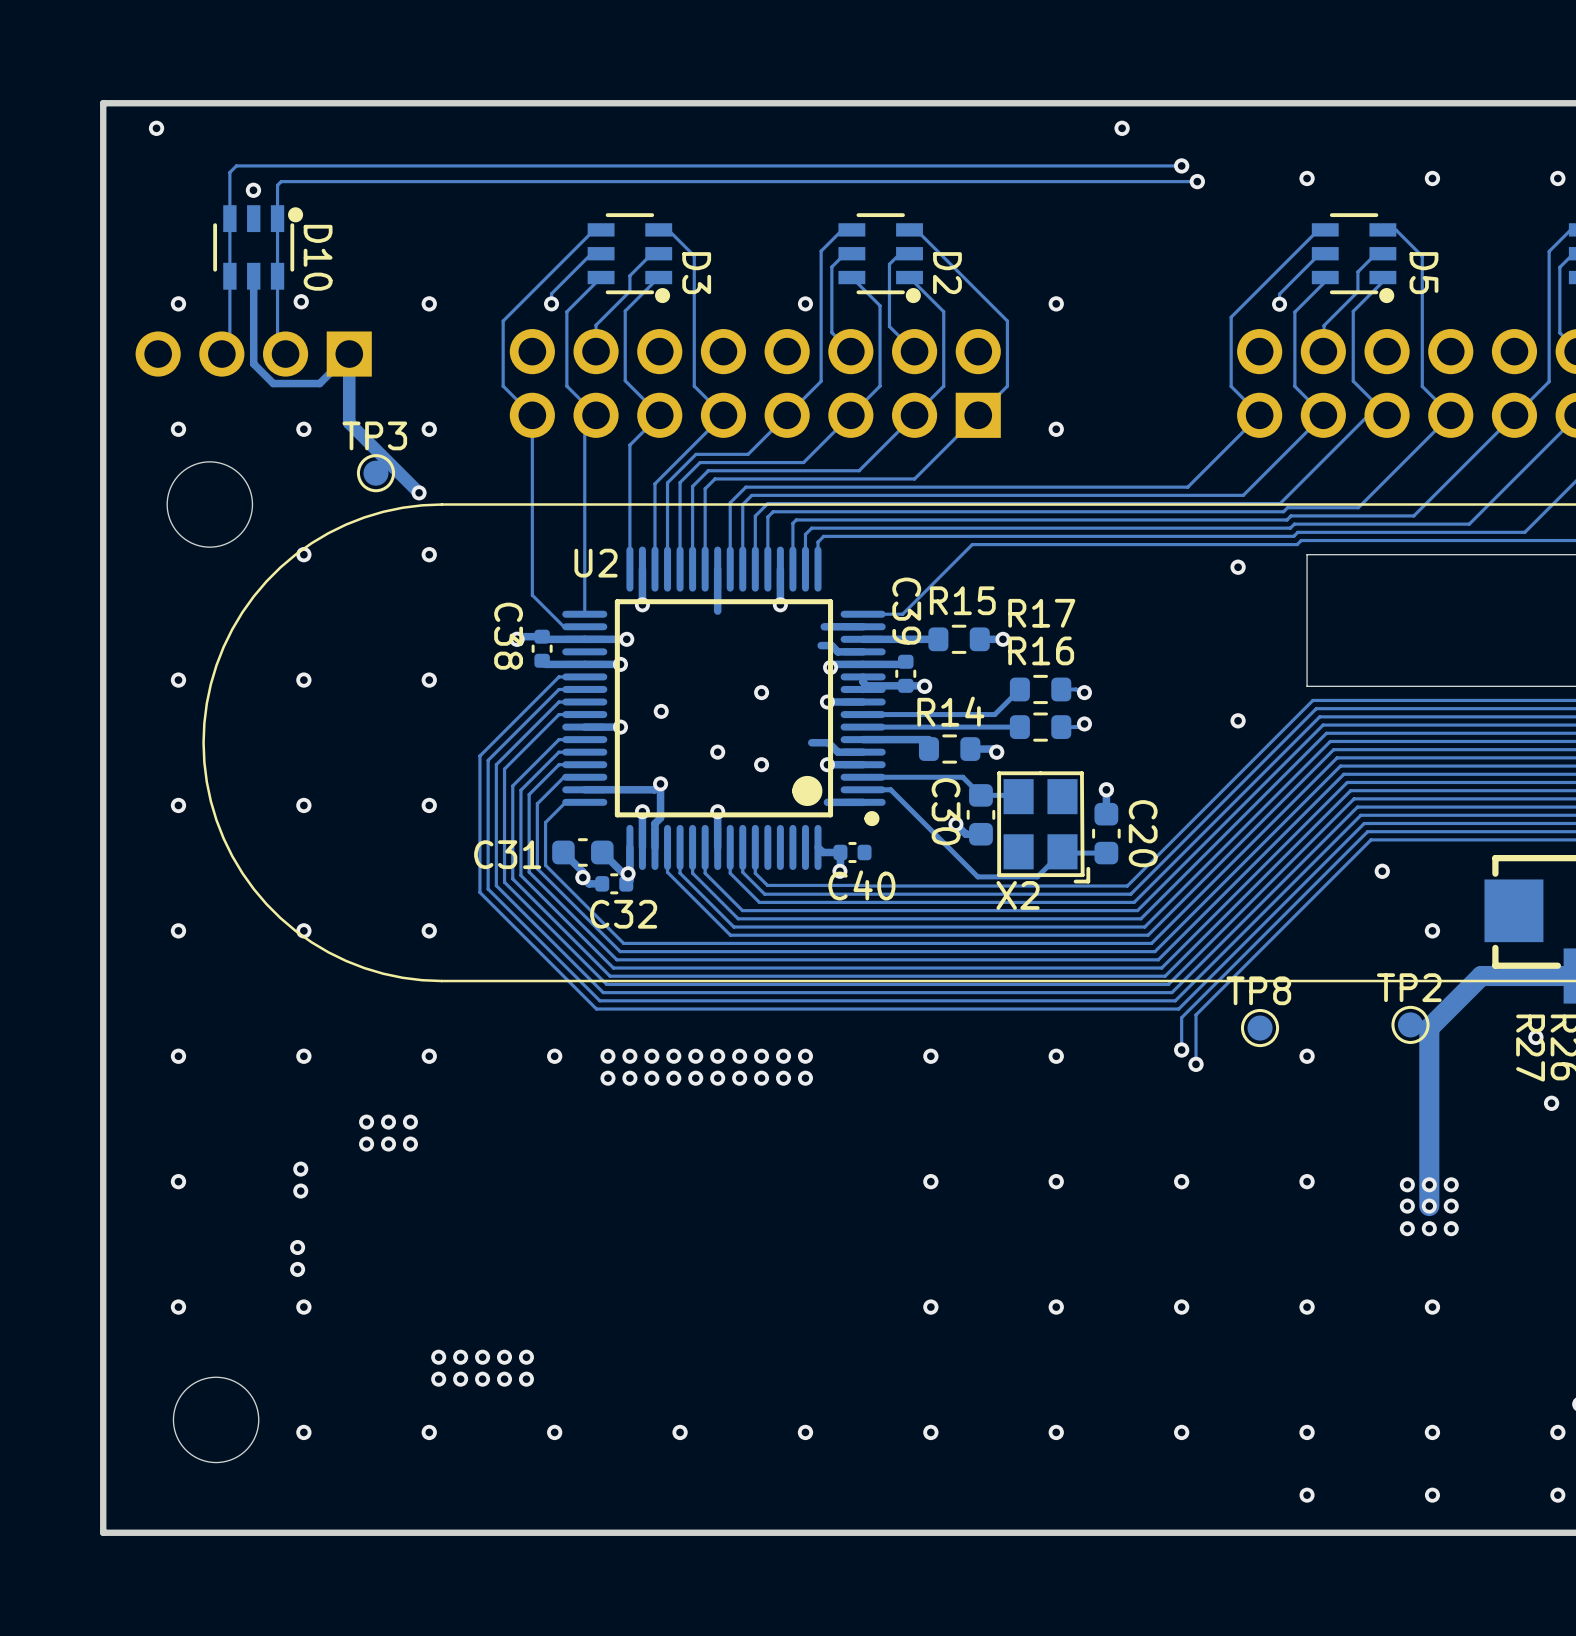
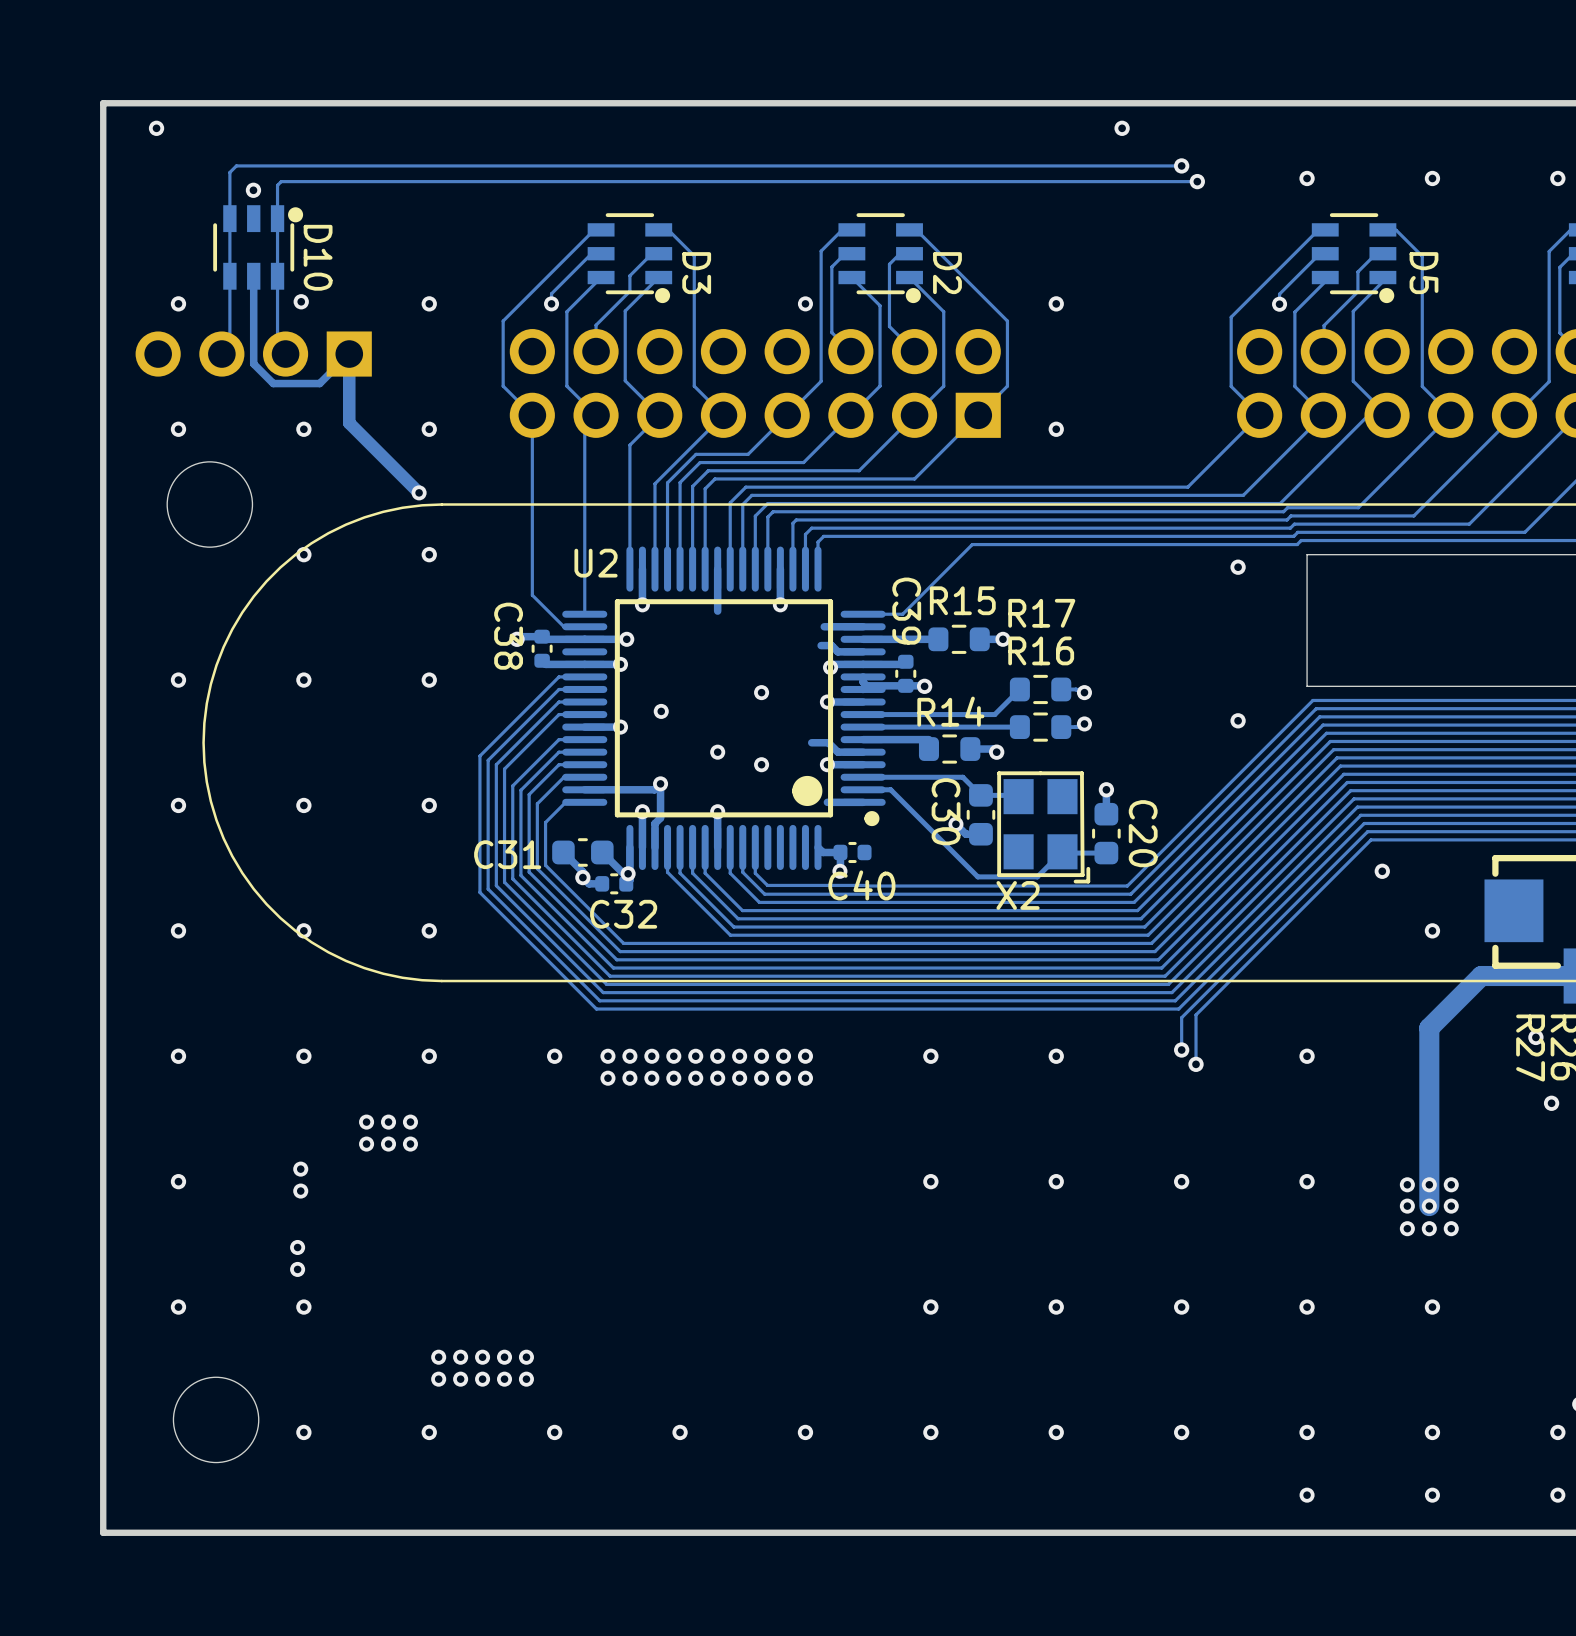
TP3: (375, 473) -> none
TP2: (1410, 1024) -> none
TP8: (1260, 1028) -> none

